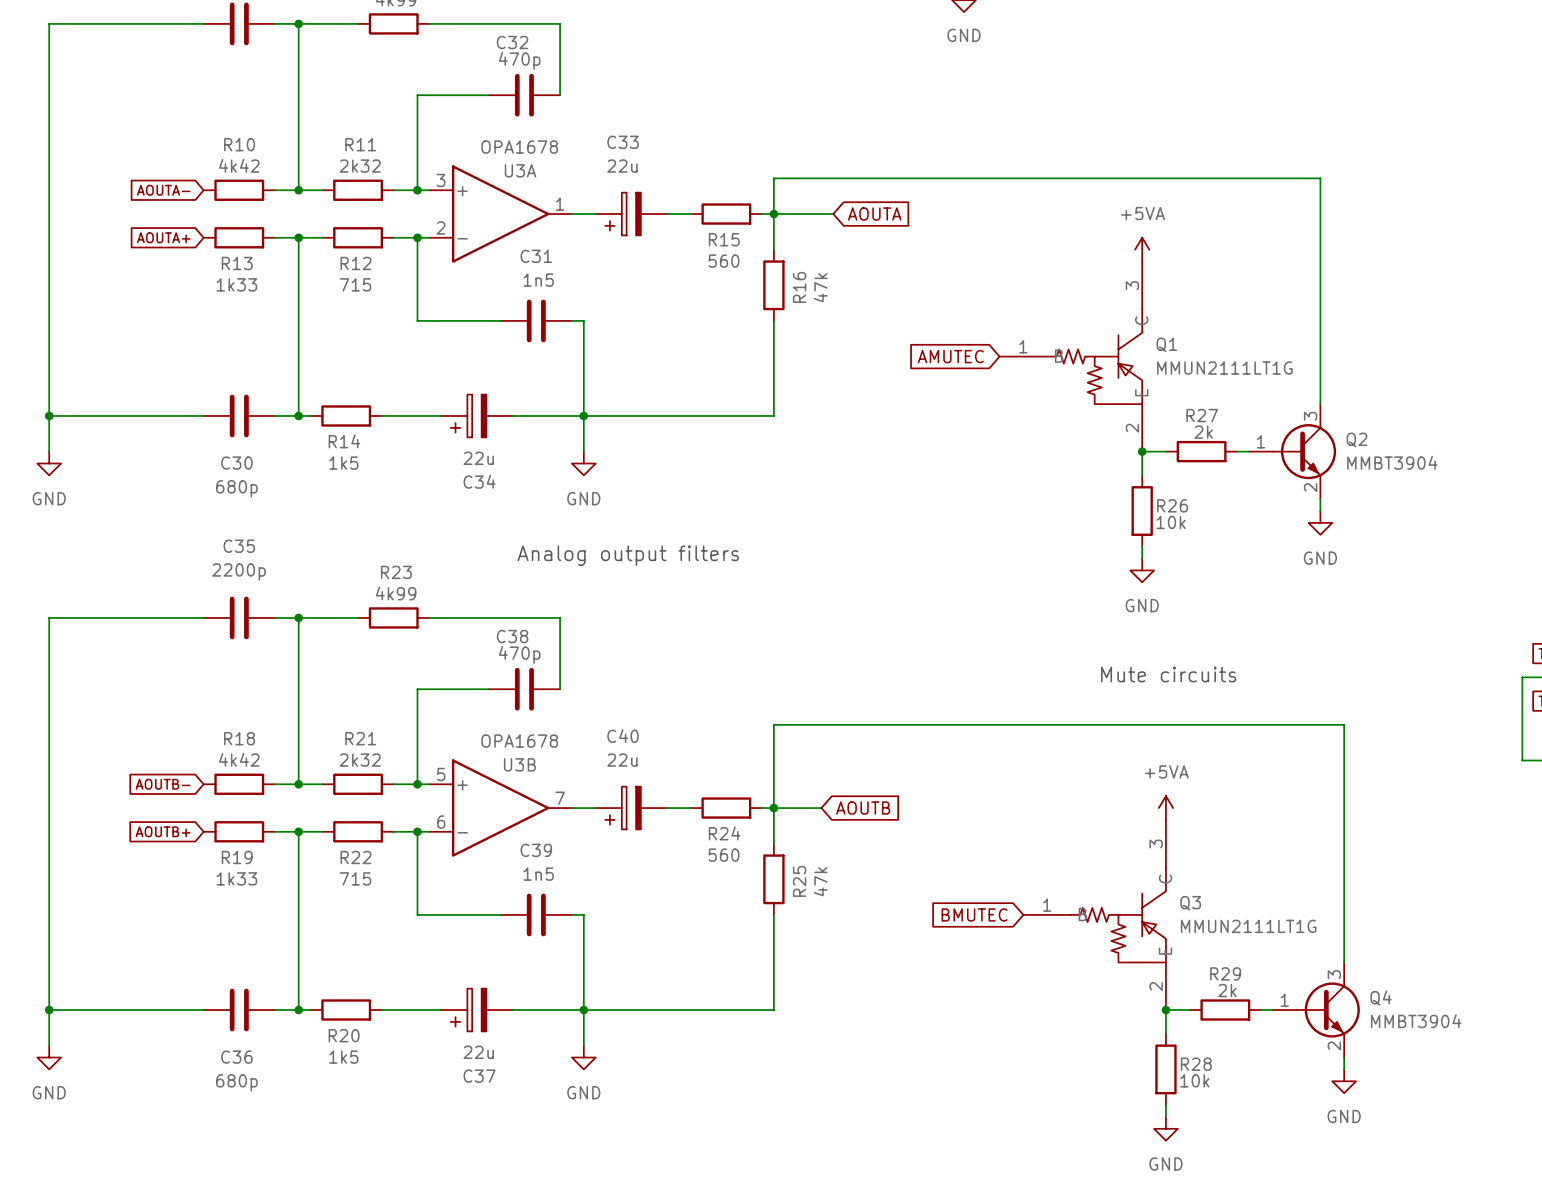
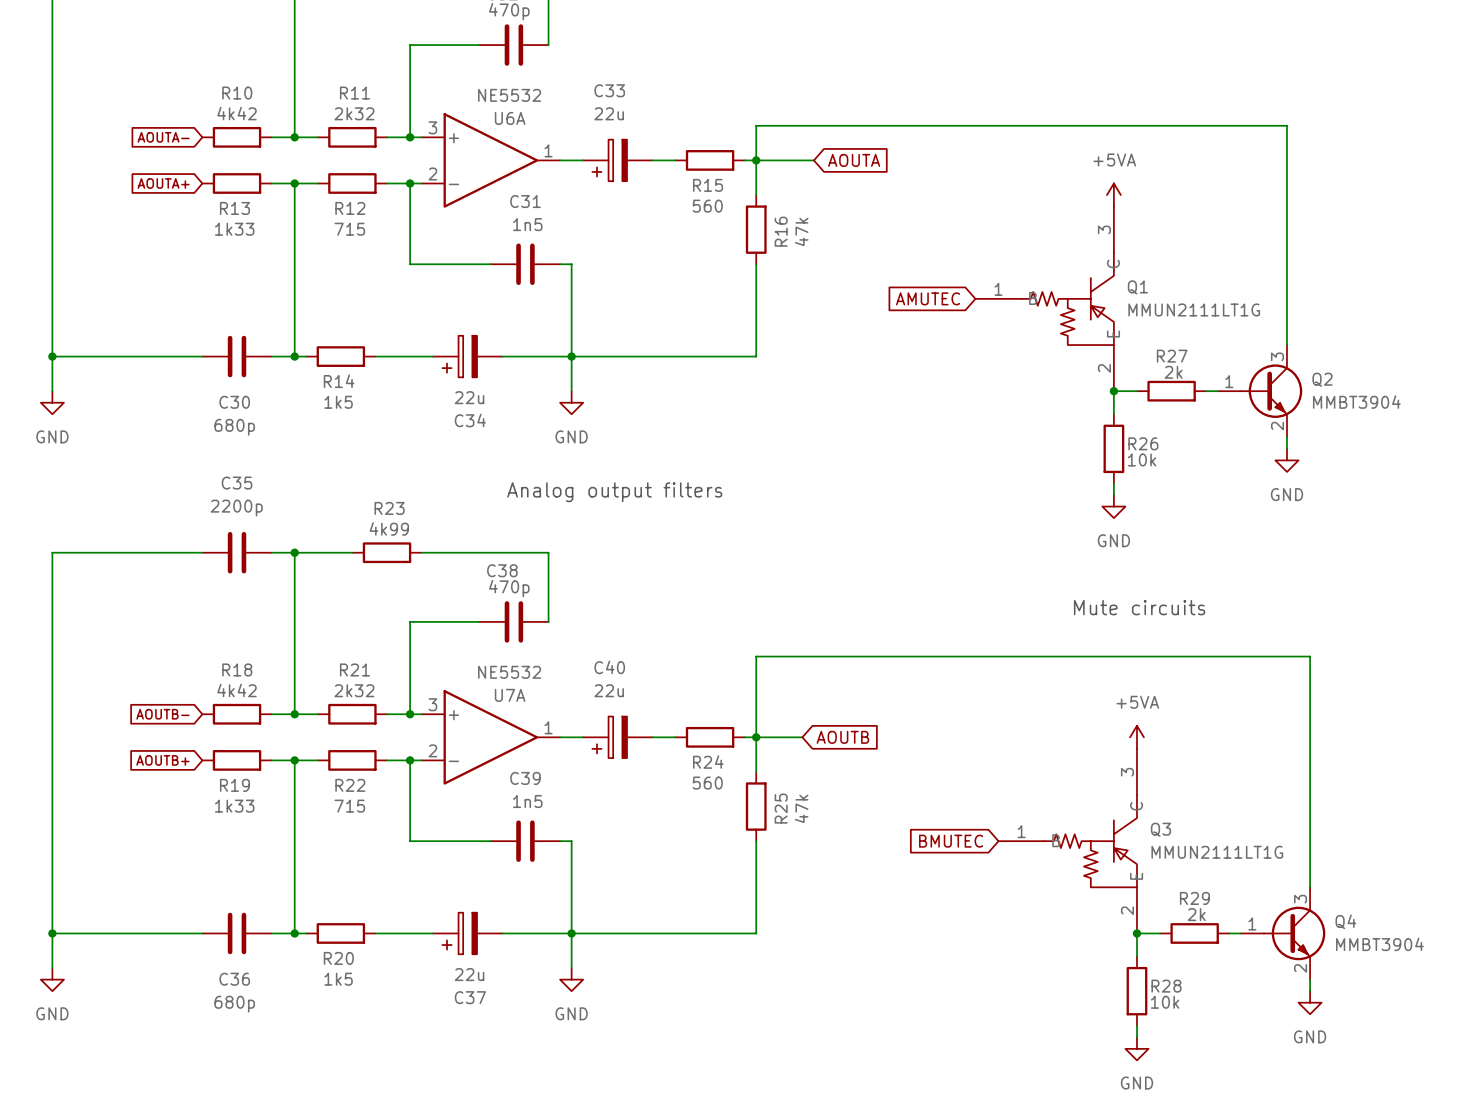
U3A value: OPA1678 (519, 147) -> NE5532 (509, 95)
U3A name: U3A (520, 170) -> U6A (510, 118)
U3B value: OPA1678 (519, 741) -> NE5532 (509, 672)
U3B name: U3B (519, 764) -> U7A (510, 695)
U3B pin number: 5 (441, 774) -> 3 (432, 704)
U3B pin number: 7 (560, 798) -> 1 (548, 727)
U3B pin number: 6 (441, 822) -> 2 (432, 750)

